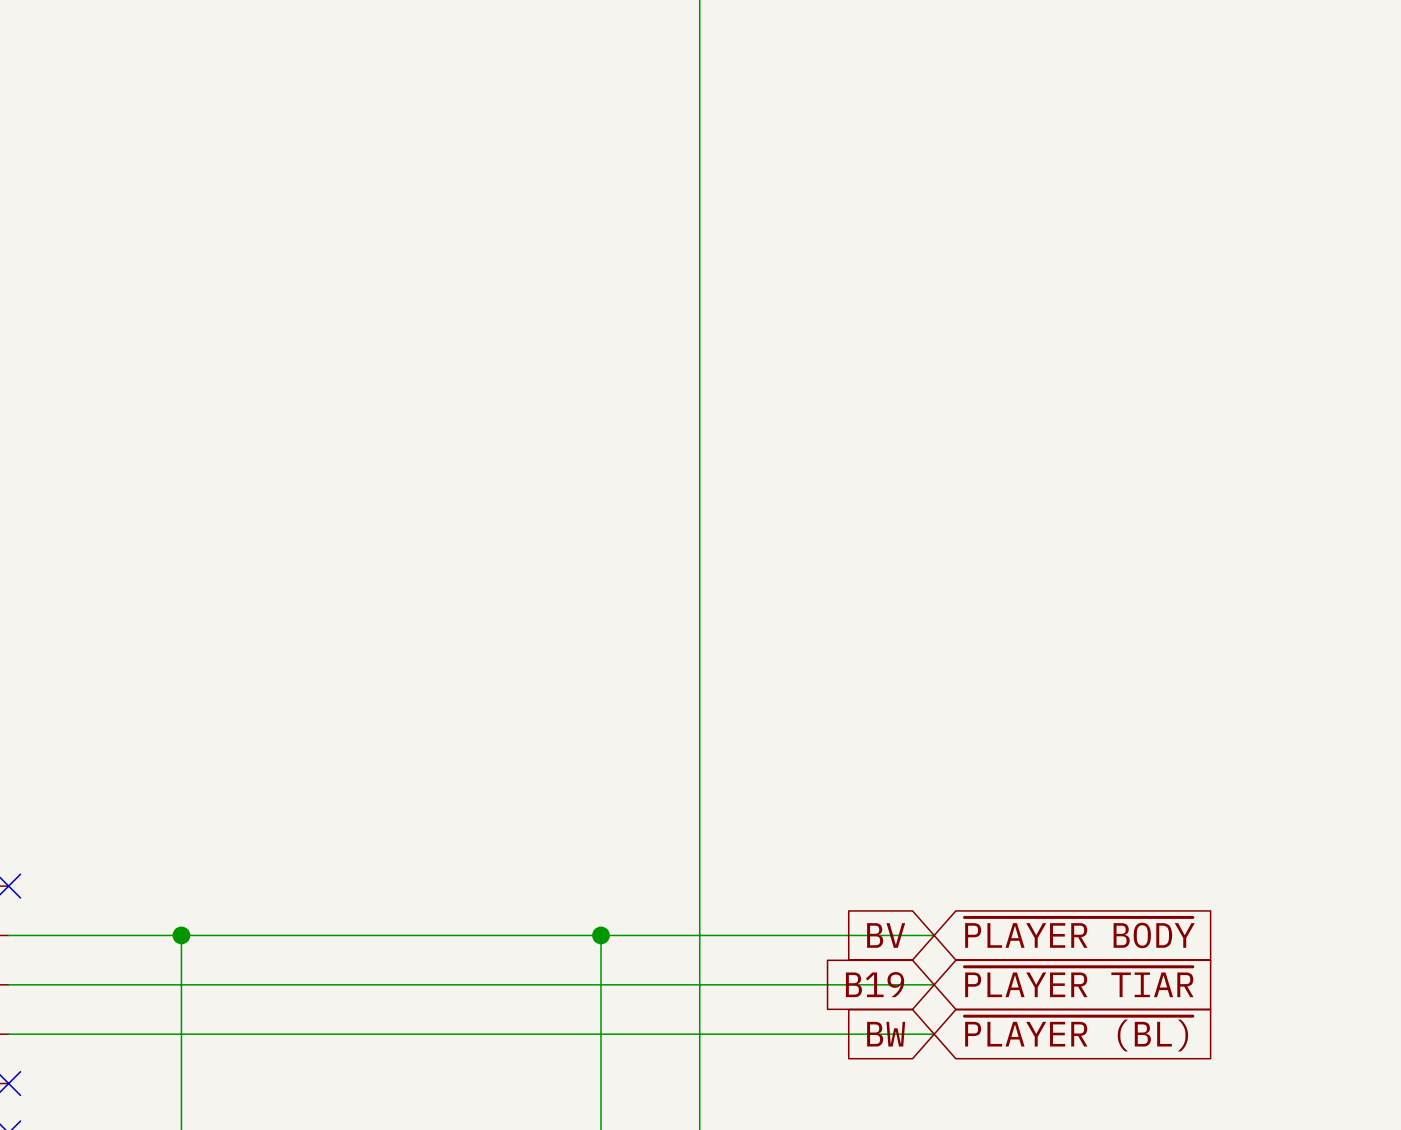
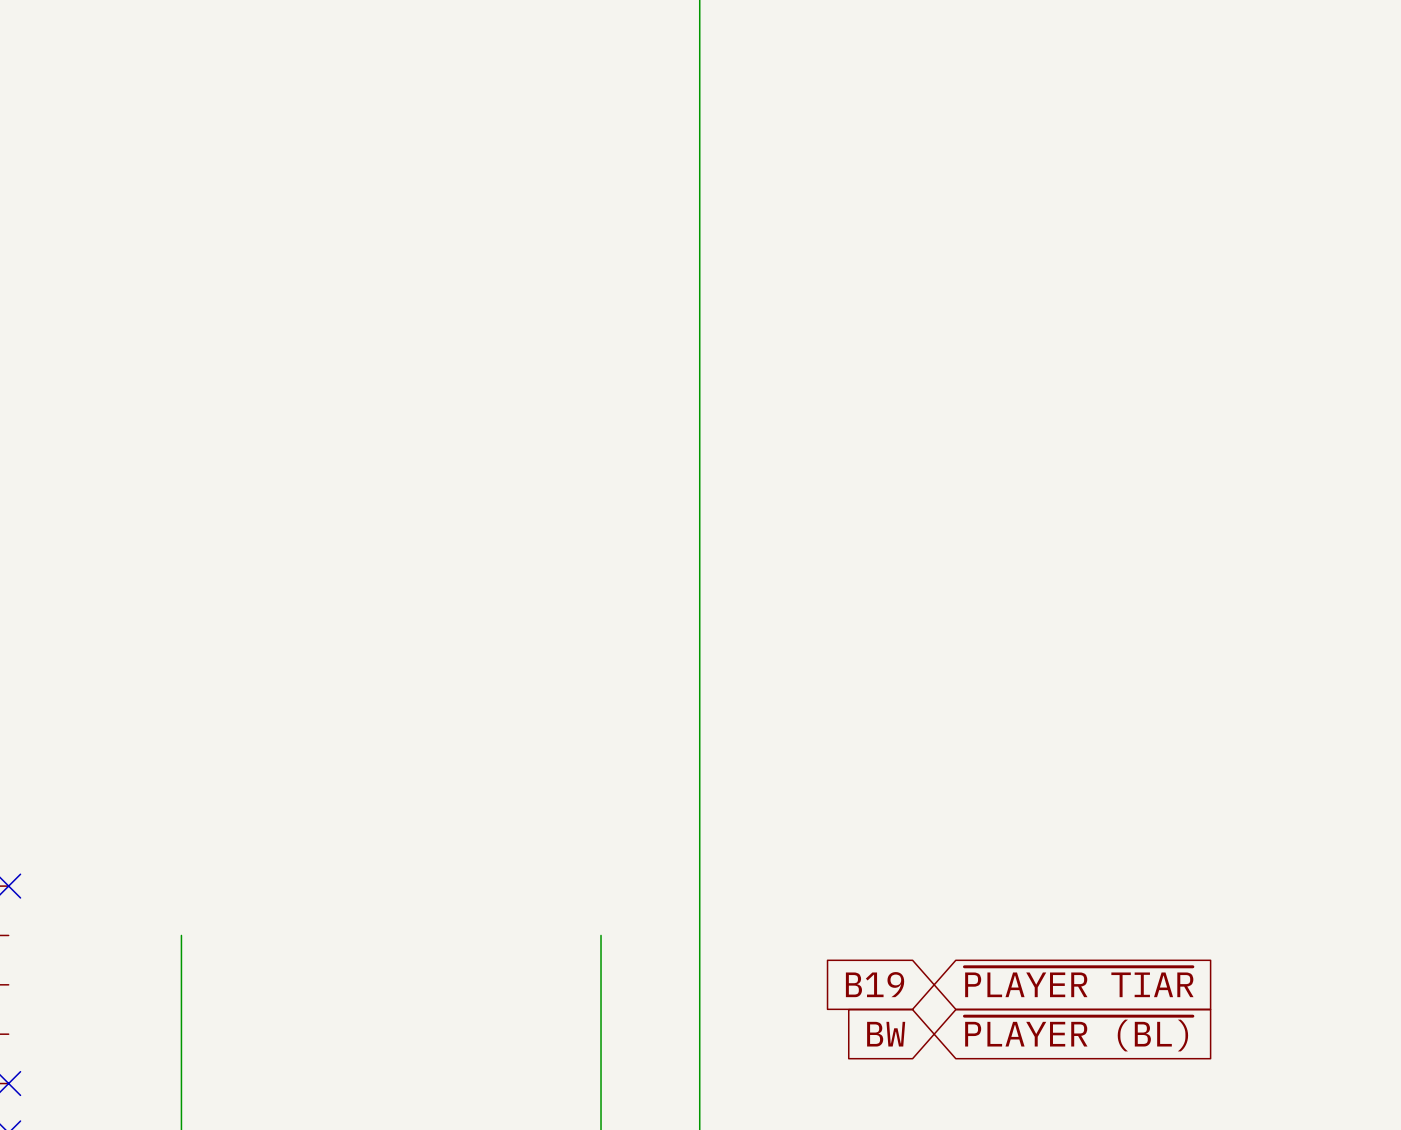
global label: ~{PLAYER BODY} (1079, 932) -> none
wire: (8, 935) (934, 935) -> none
junction: (181, 935) -> none
junction: (601, 935) -> none
global label: BV (886, 935) -> none
wire: (8, 984) (934, 984) -> none
wire: (8, 1034) (934, 1034) -> none

